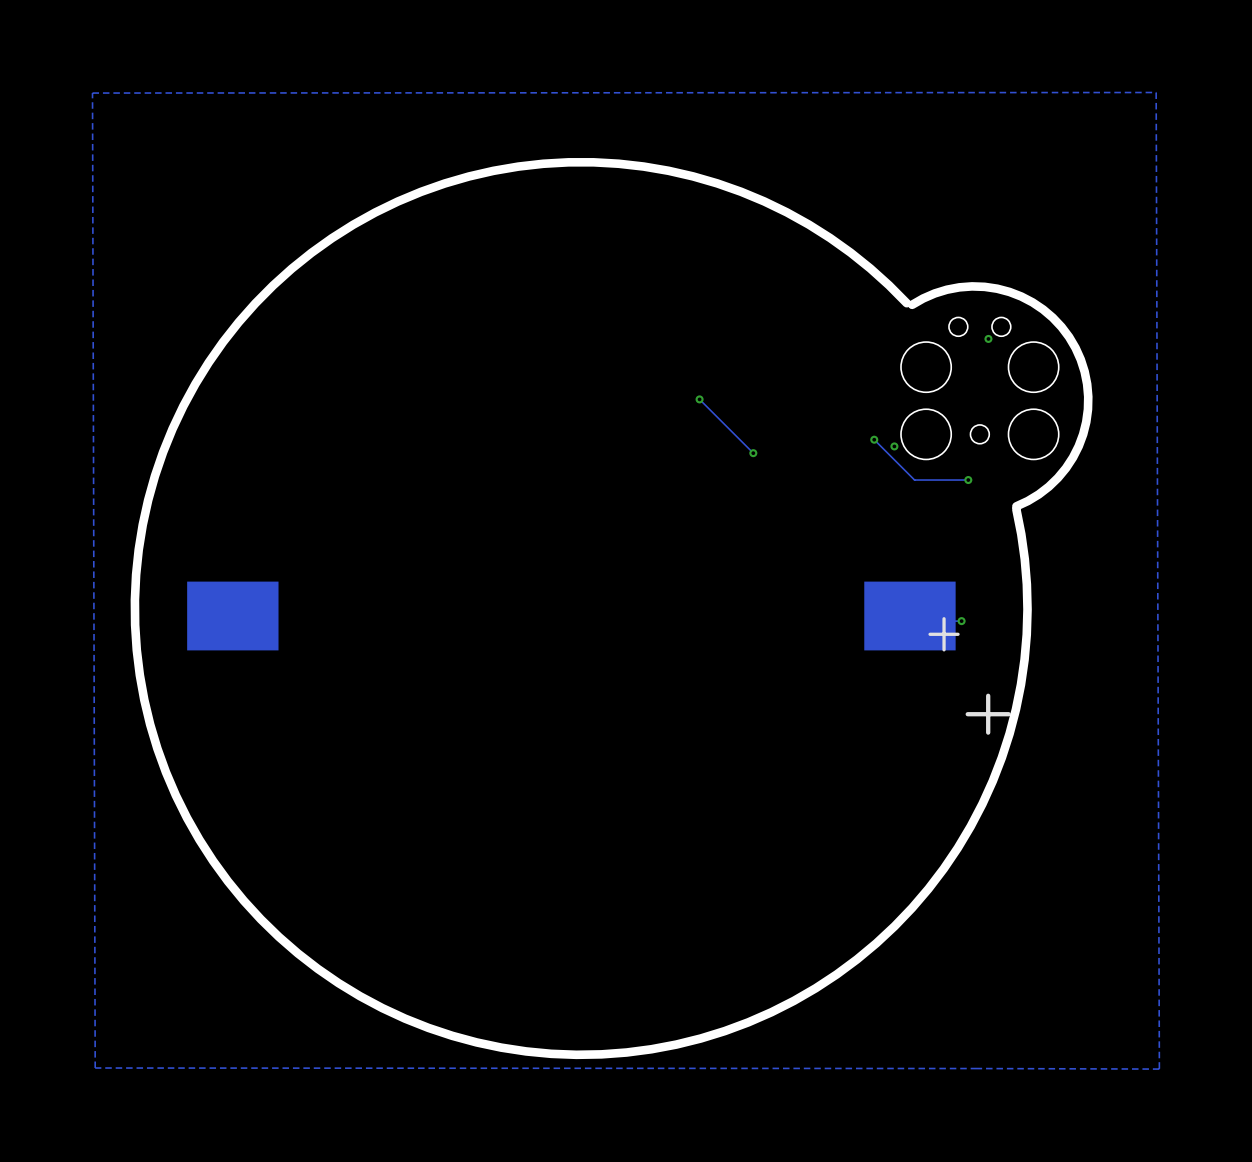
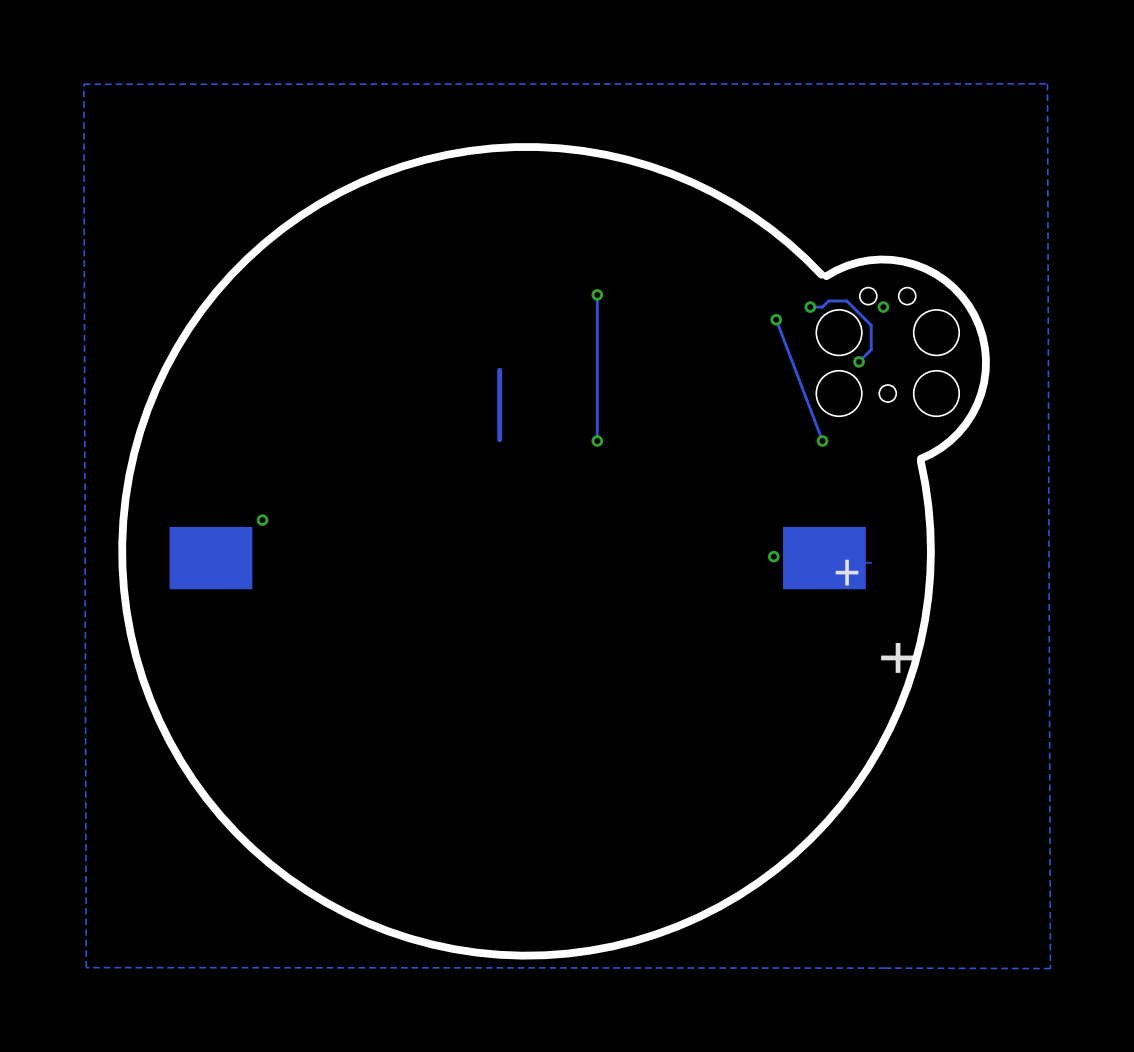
track: none -> (597, 294) (597, 440)
via: none -> (597, 294)
track: none -> (810, 307) (822, 307) (828, 300) (846, 300) (871, 325) (871, 349) (859, 361)
via: none -> (810, 307)
via: none -> (883, 307)
via: (988, 338) -> none
track: none -> (776, 319) (822, 440)
via: none -> (776, 319)
track: (699, 399) (753, 453) -> none
via: (699, 399) -> none
via: none -> (859, 361)
track: none -> (499, 370) (499, 439)
track: (874, 439) (914, 480) (968, 480) -> none
via: (874, 439) -> none
via: (894, 446) -> none
via: (753, 453) -> none
via: (968, 480) -> none
via: none -> (597, 440)
via: none -> (822, 440)
via: none -> (262, 520)
via: none -> (773, 556)
via: (961, 621) -> none

